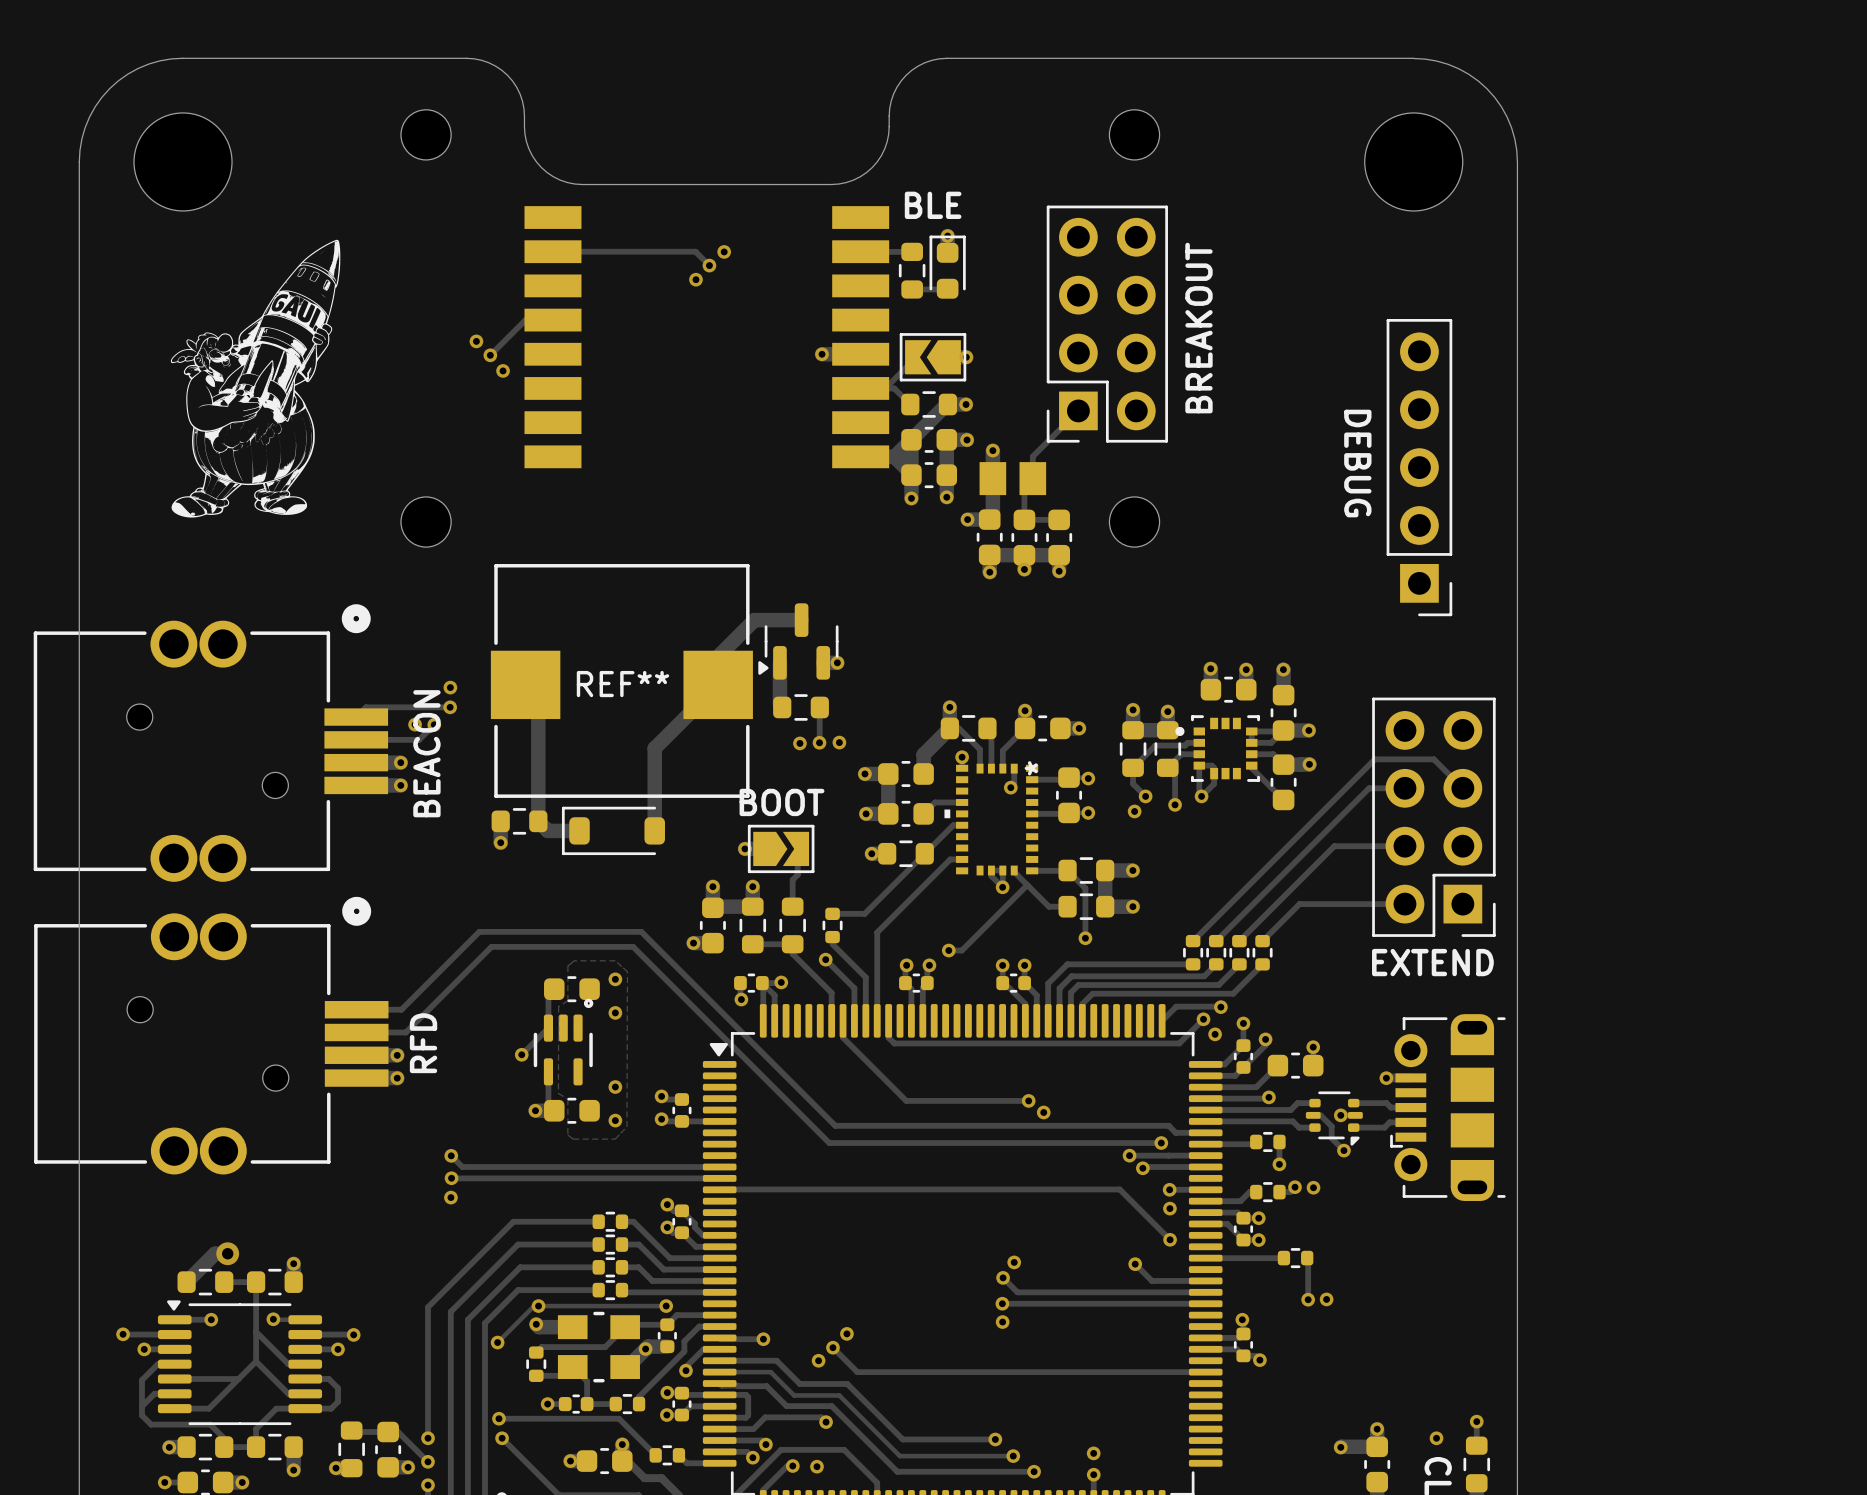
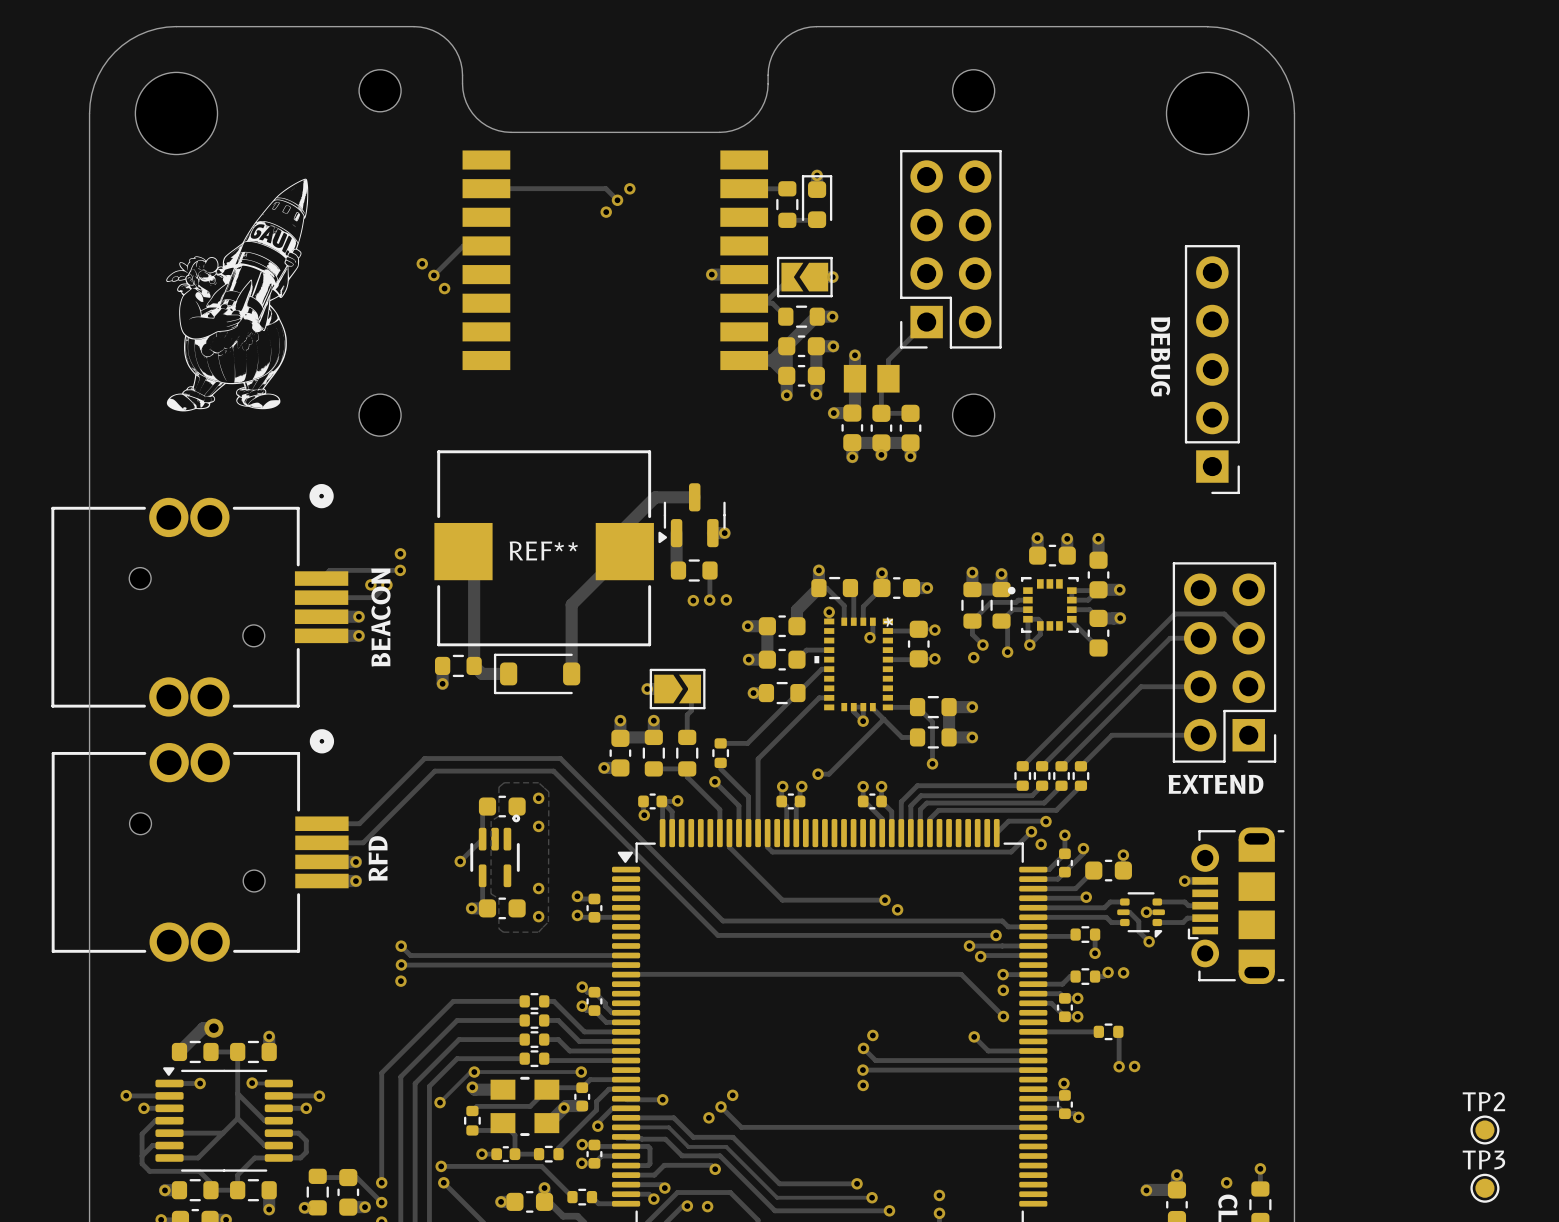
text: BLE (933, 205) -> none
text: BREAKOUT (1198, 328) -> none
text: BOOT (782, 802) -> none
TP2: none -> (1484, 1130)
TP3: none -> (1484, 1188)

